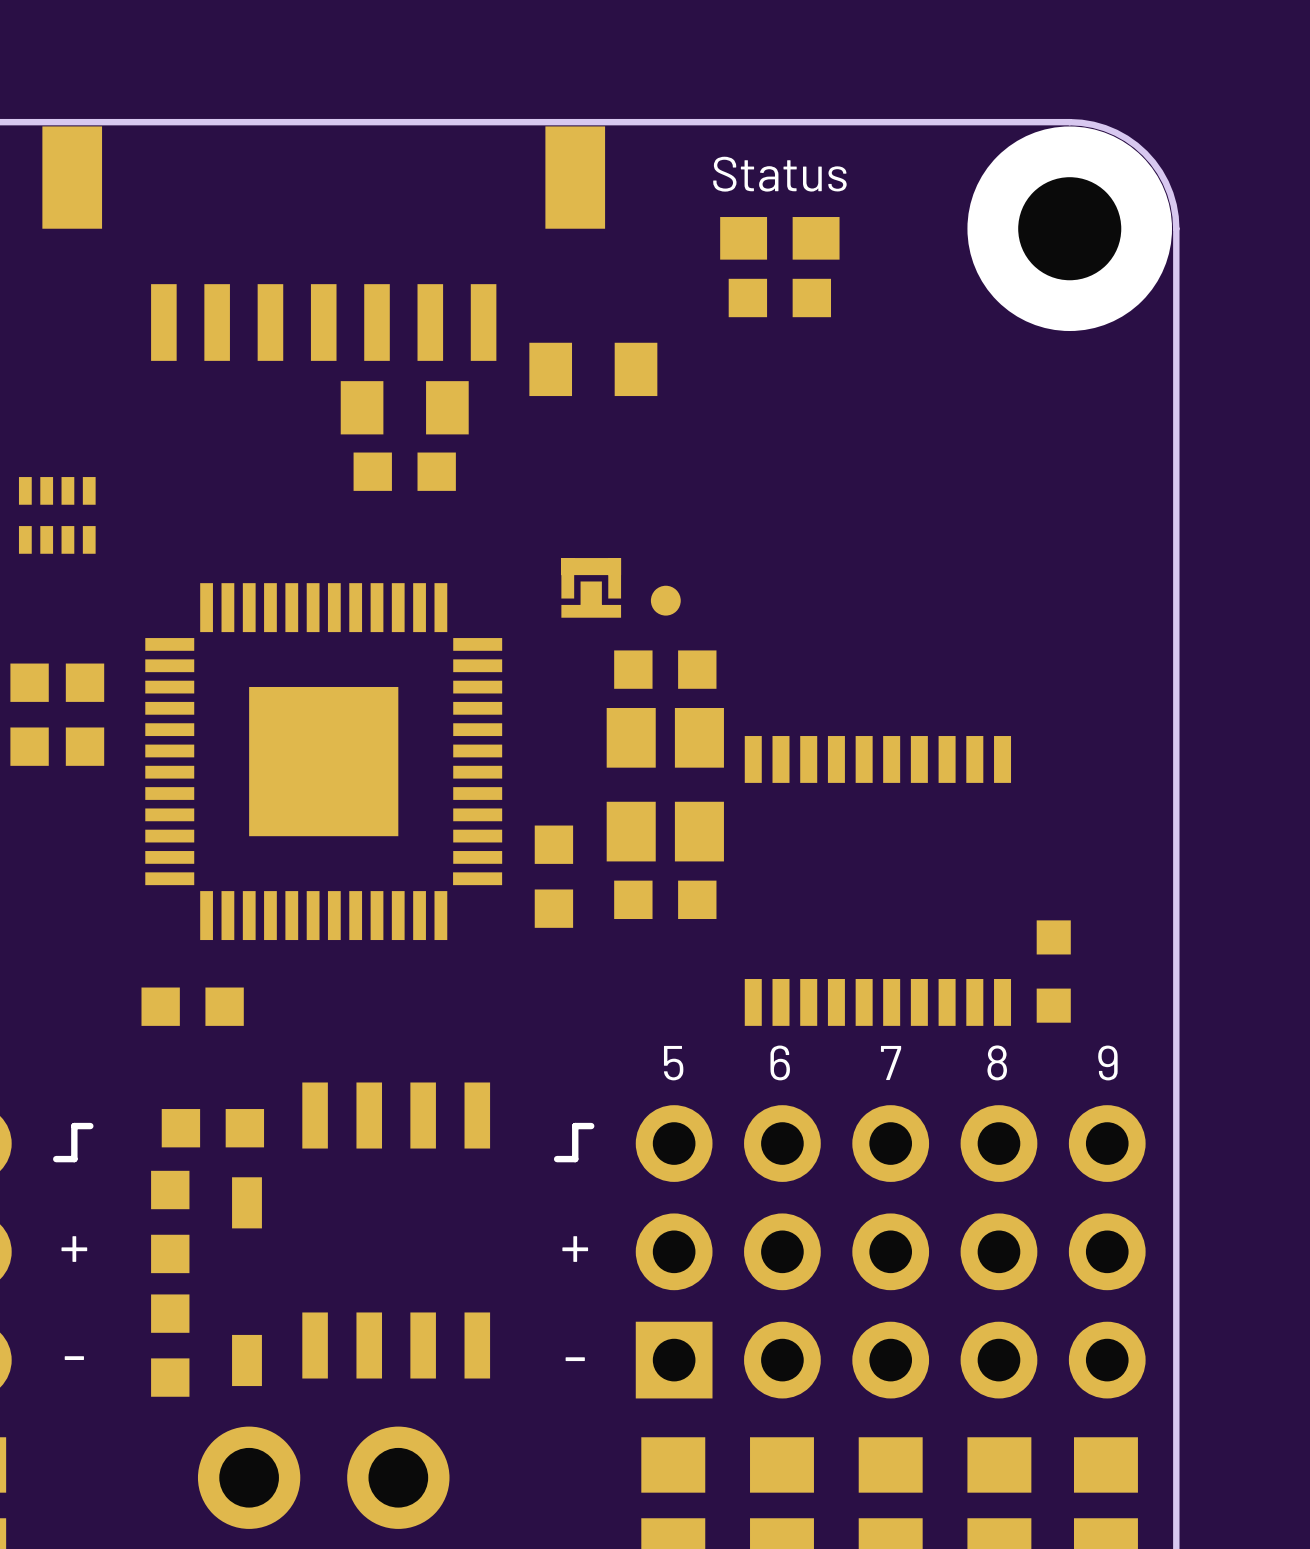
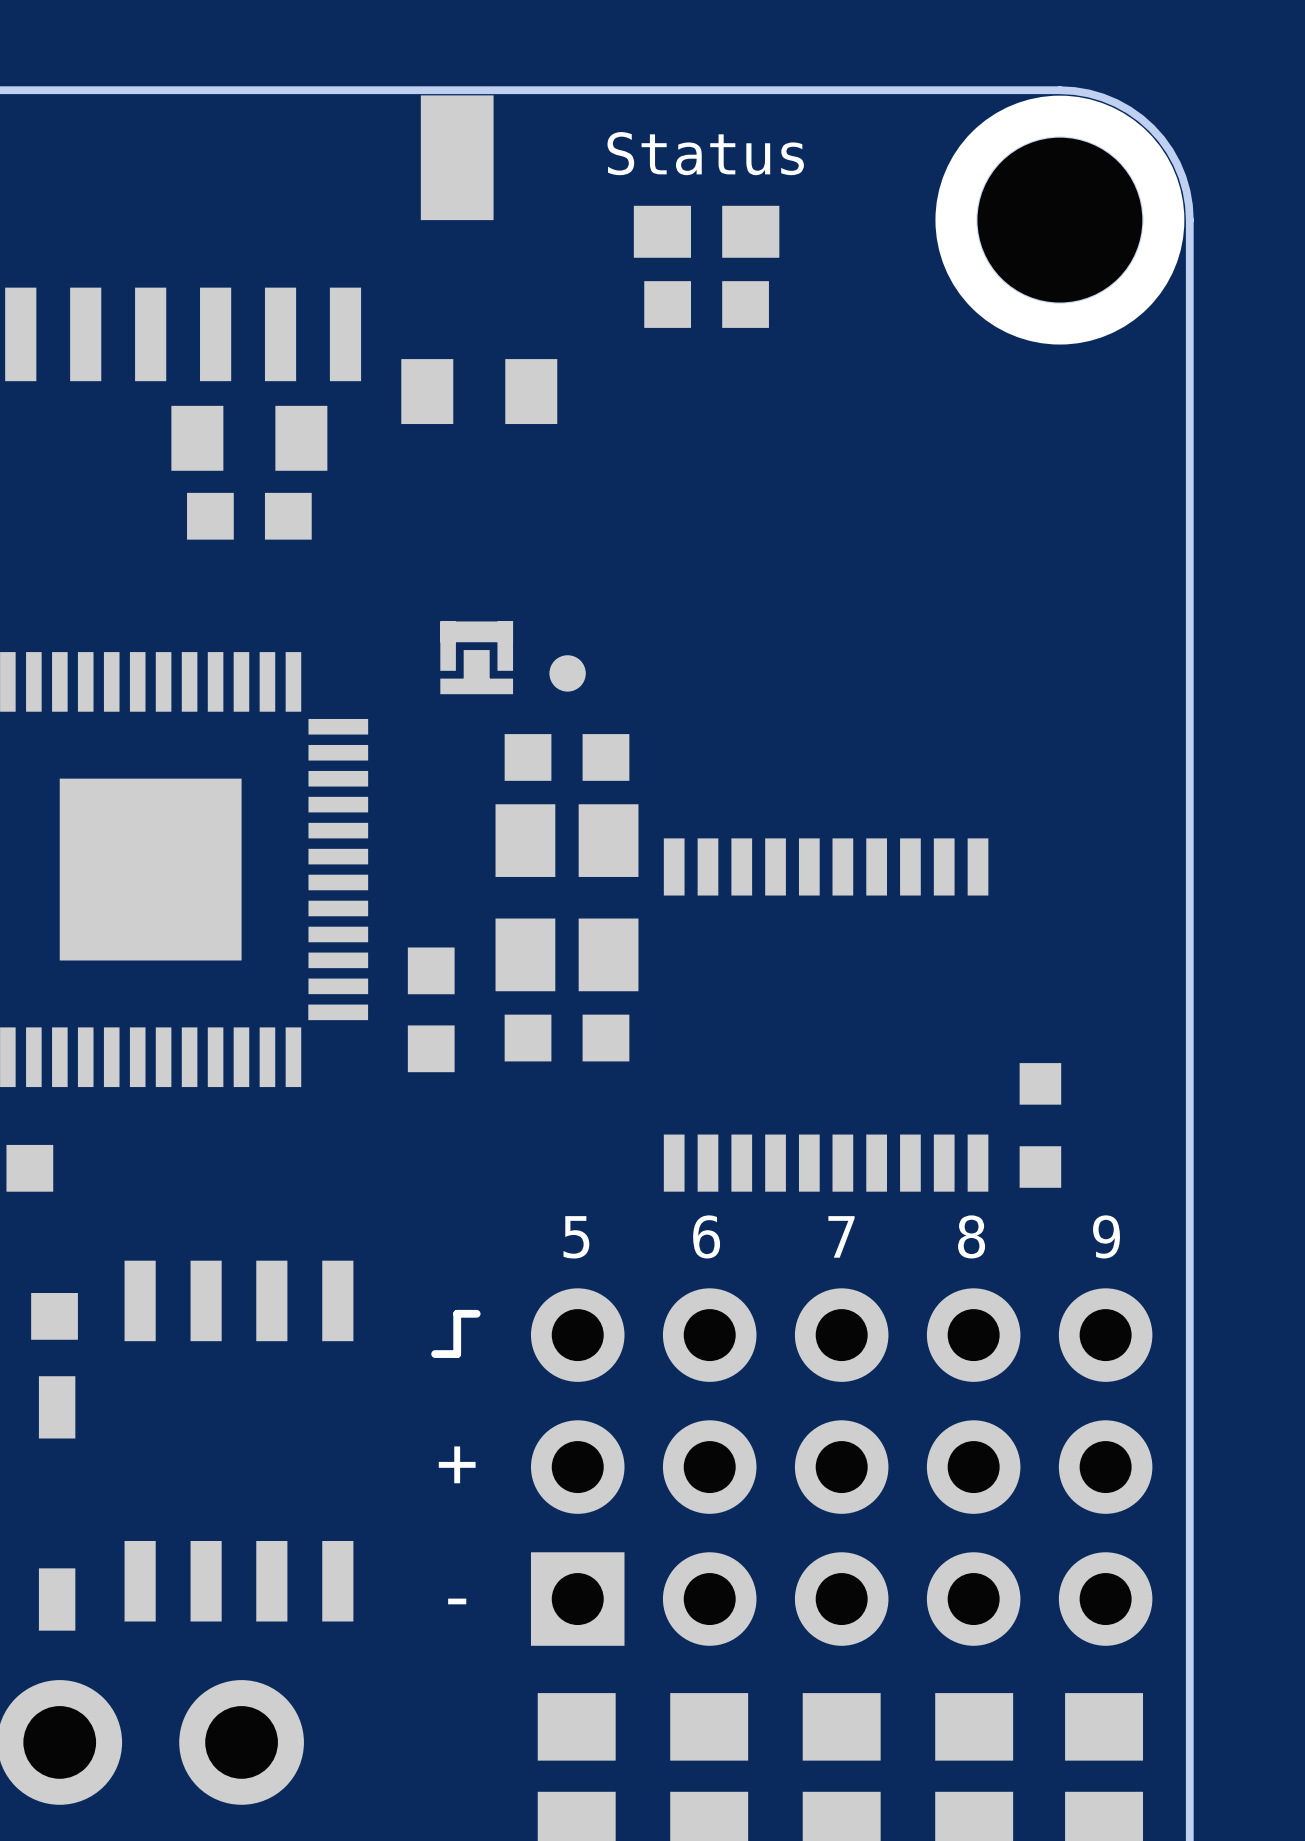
part footprint: [967, 126, 1173, 332] -> [935, 95, 1185, 345]

